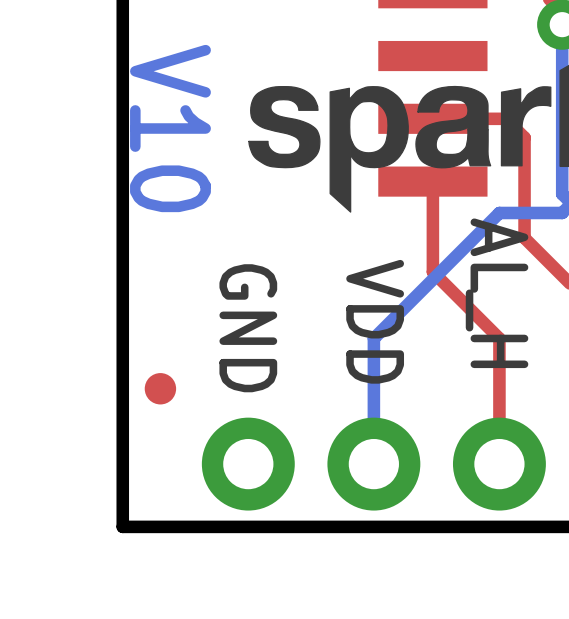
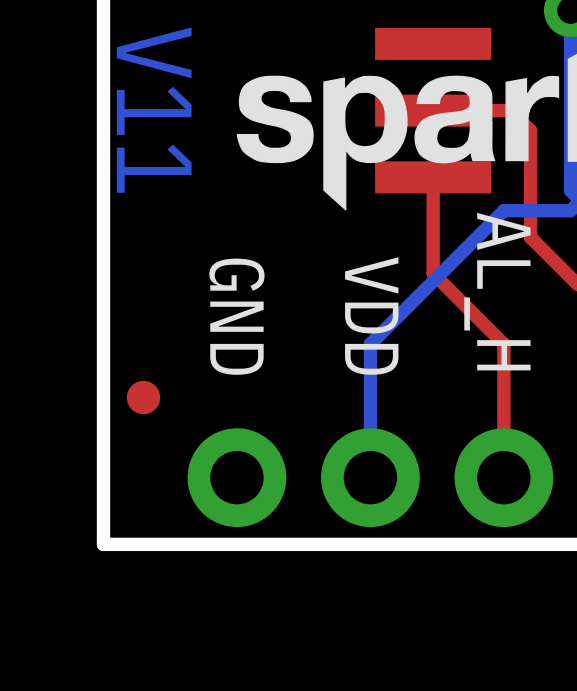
text: V10 (170, 128) -> V11 (154, 110)

